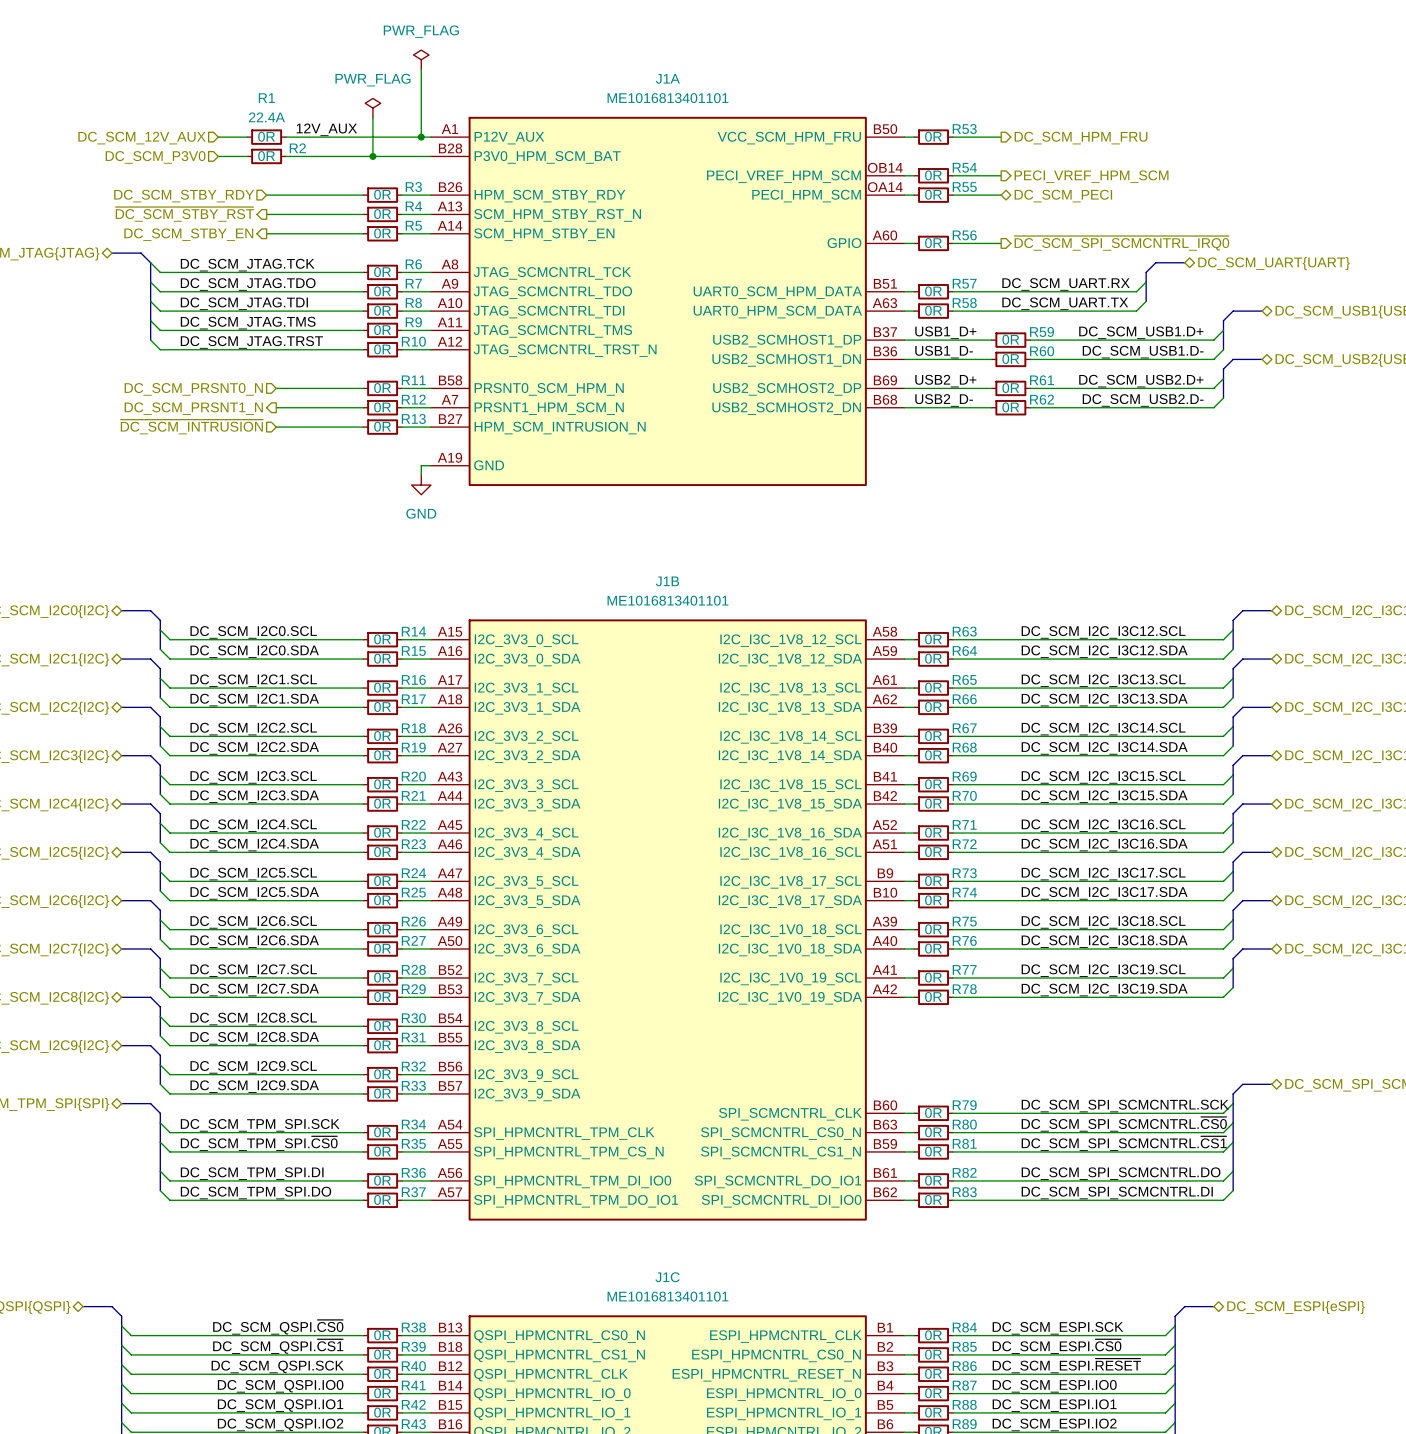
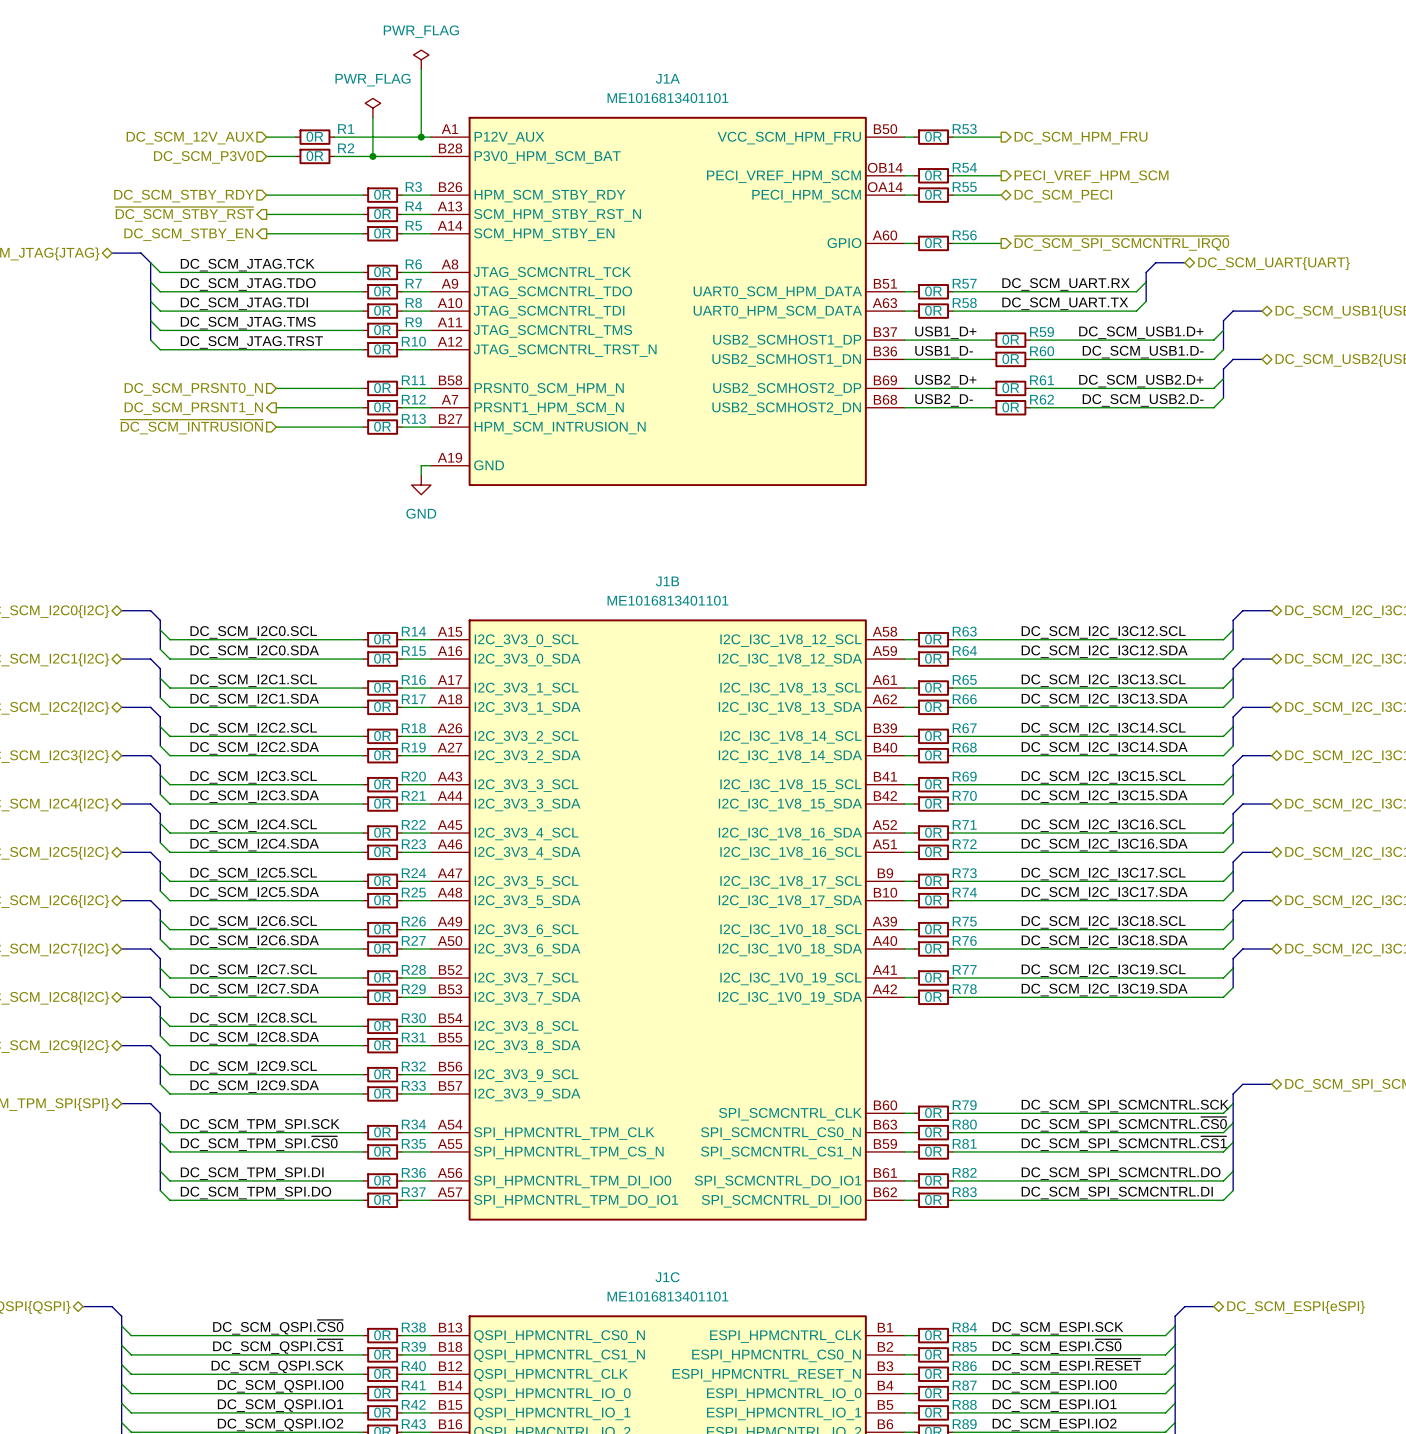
R1 name position: R1 (266, 98) -> R1 (346, 129)
R1 text: 22.4A (266, 117) -> none
label: 12V_AUX (326, 129) -> none
wire: (218, 137) (247, 137) -> none
R1 position: (266, 137) -> (314, 137)
hierarchical label position: DC_SCM_12V_AUX (142, 138) -> DC_SCM_12V_AUX (190, 138)
wire: (218, 156) (247, 156) -> none
R2 position: (266, 156) -> (314, 156)
hierarchical label position: DC_SCM_P3V0 (155, 157) -> DC_SCM_P3V0 (203, 157)

